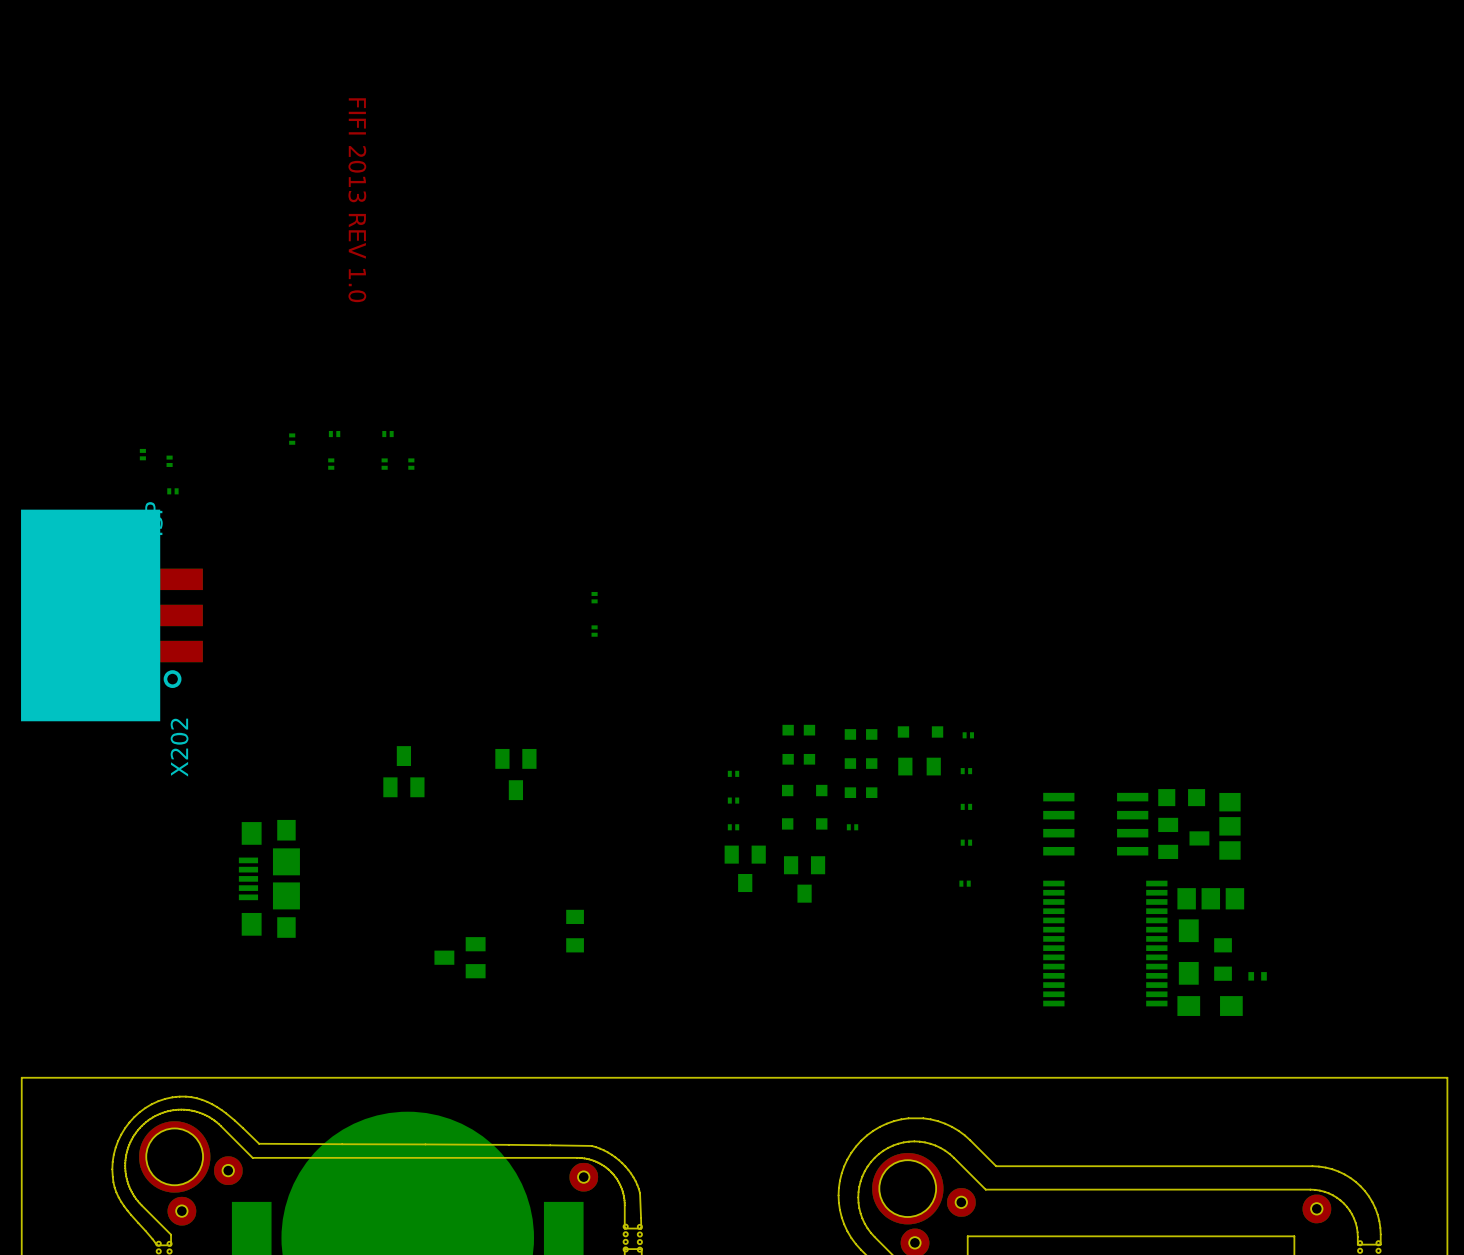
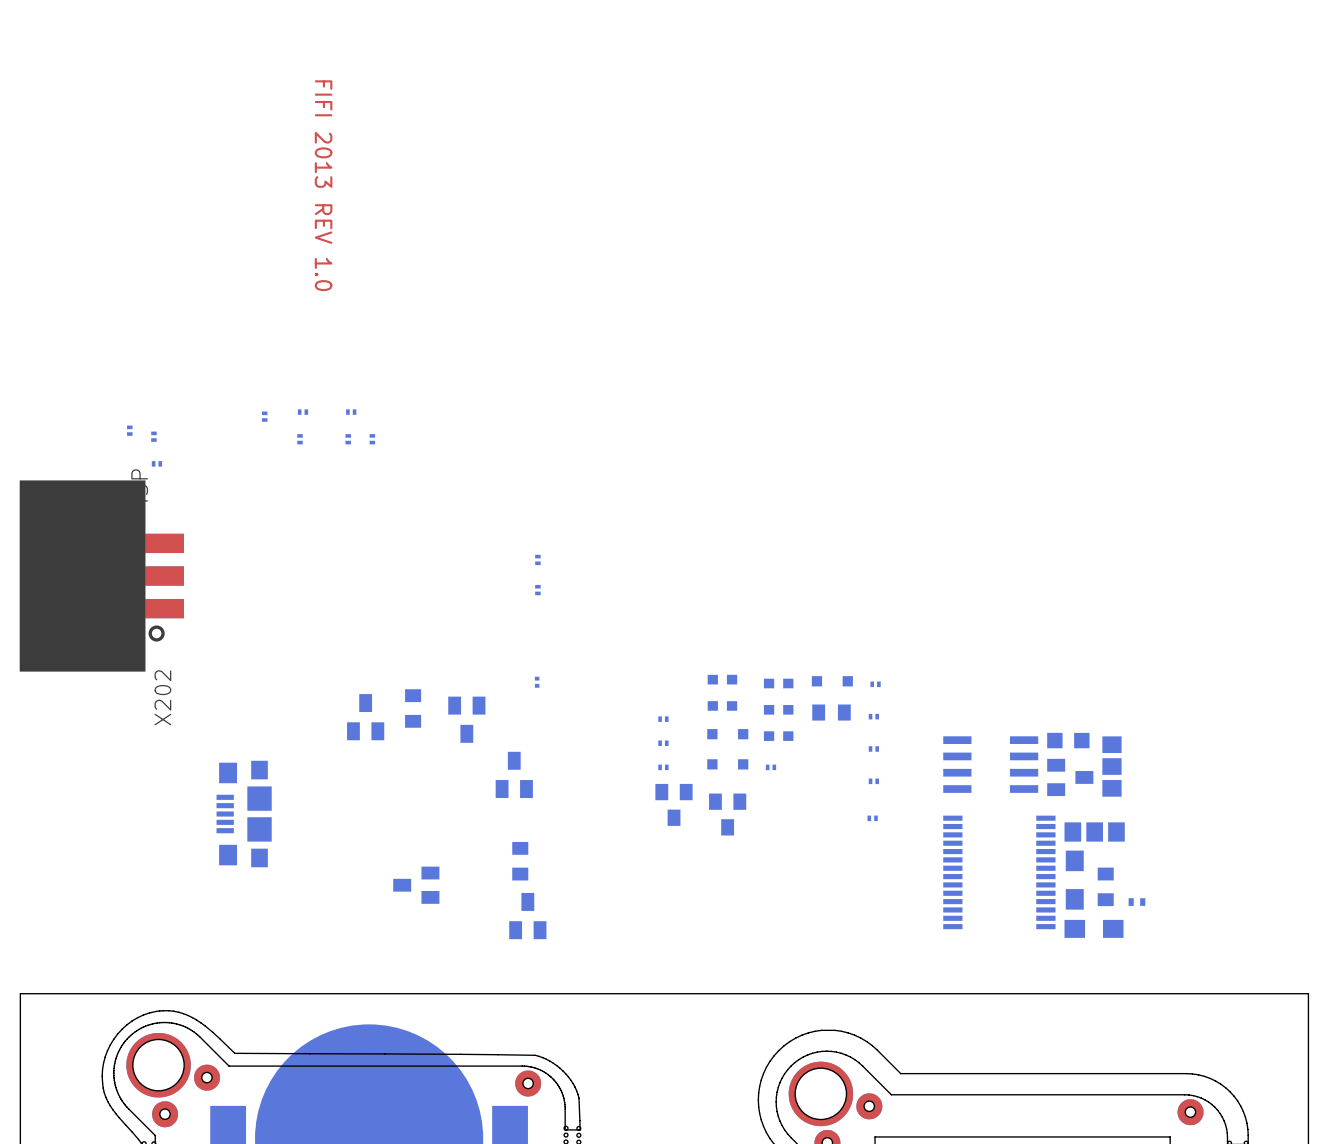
part: none -> (537, 682)
part: none -> (413, 708)
part: none -> (514, 774)
part: none -> (527, 916)

